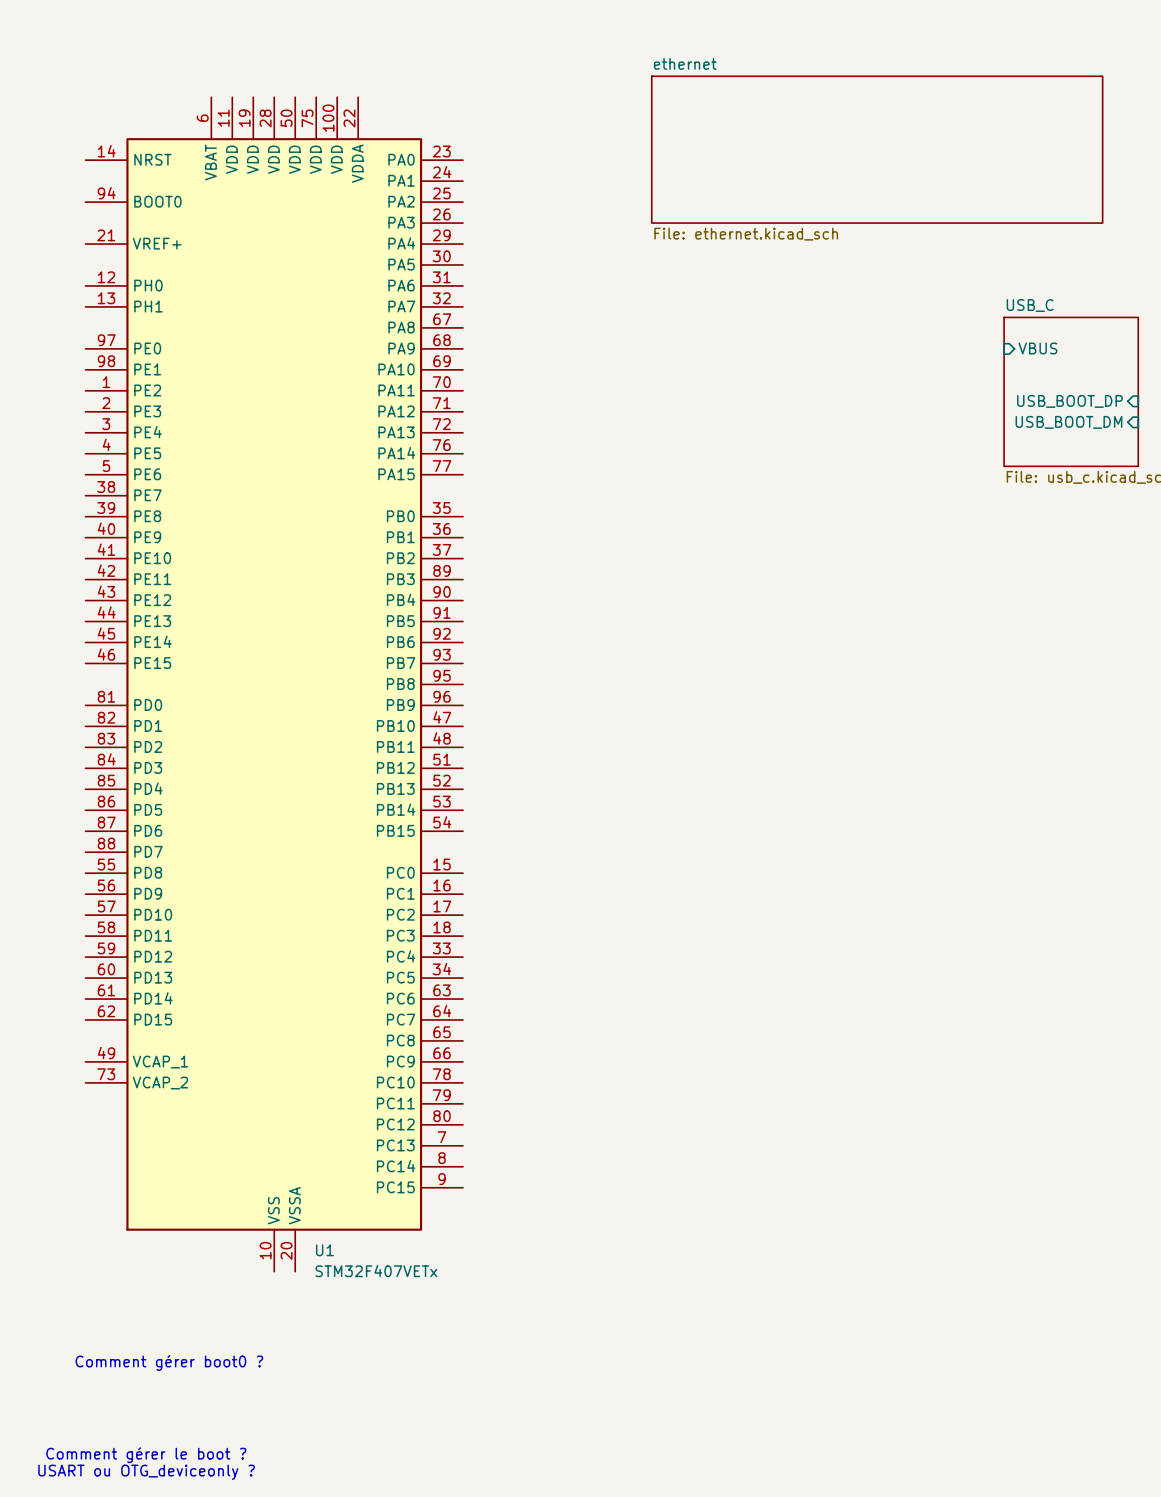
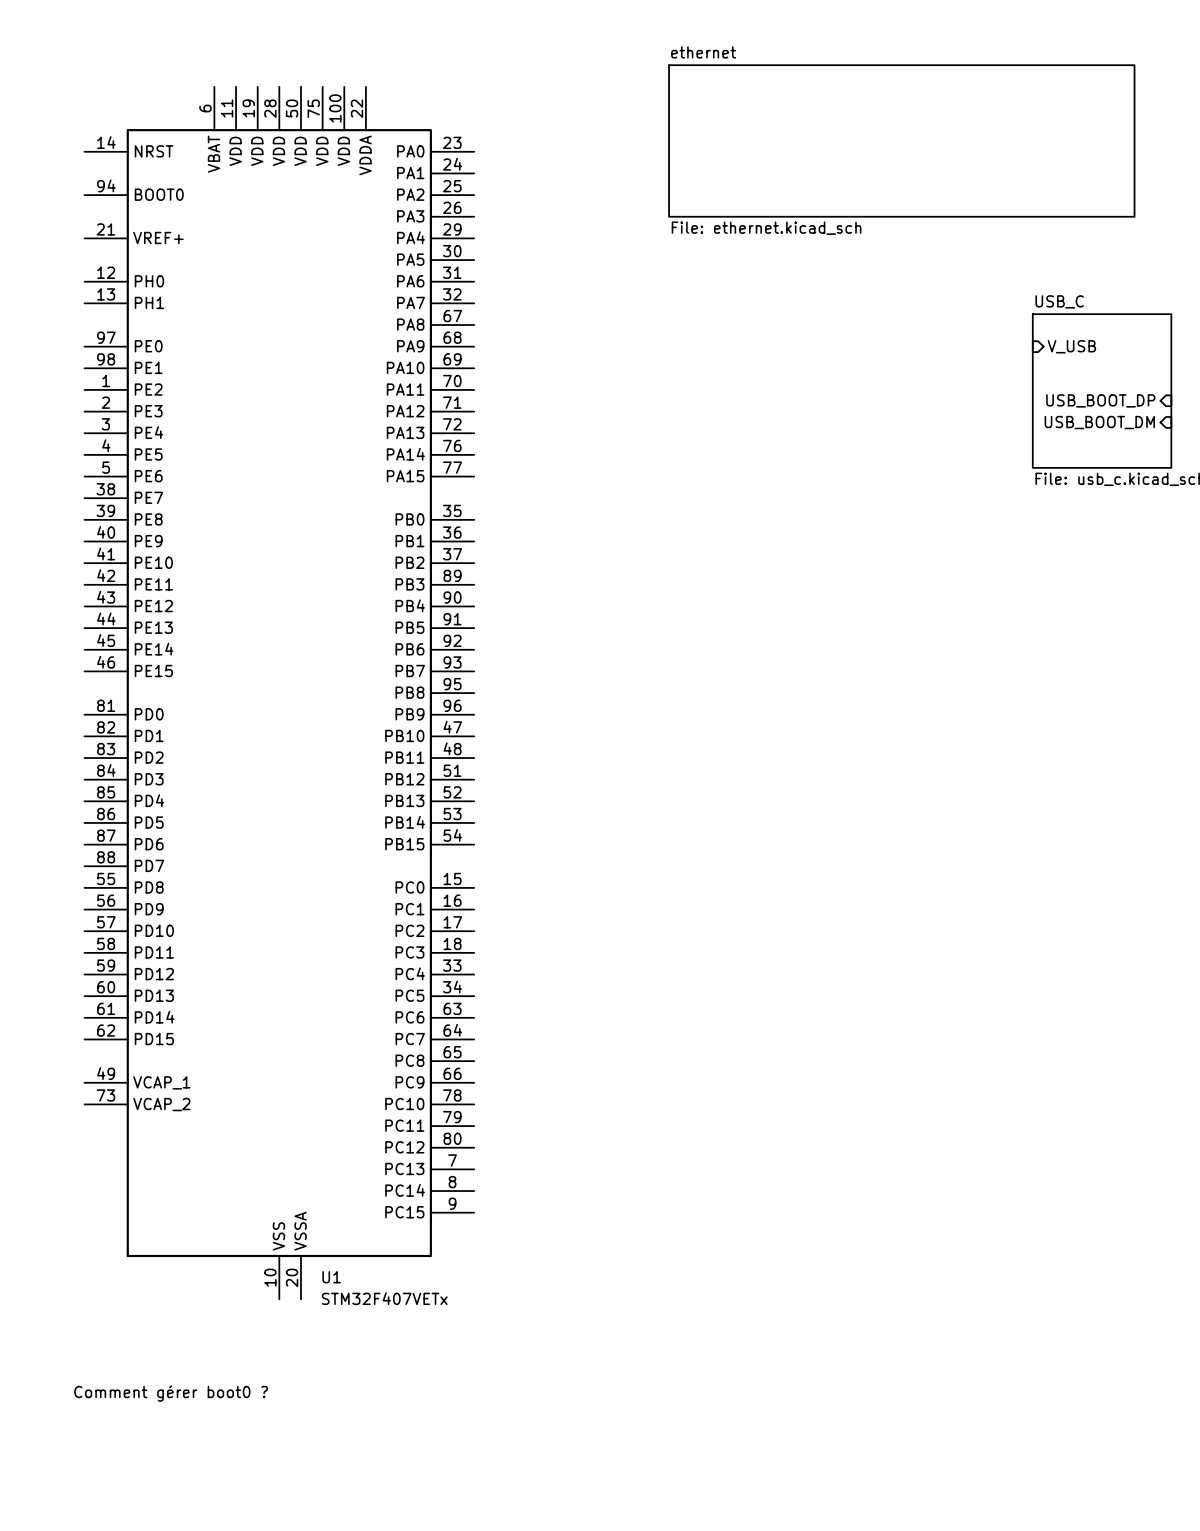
sheet pin: VBUS (1037, 348) -> V_USB (1071, 346)
text: Comment gérer le boot ? (146, 1455) -> none
text: USART ou OTG_deviceonly ? (146, 1472) -> none

